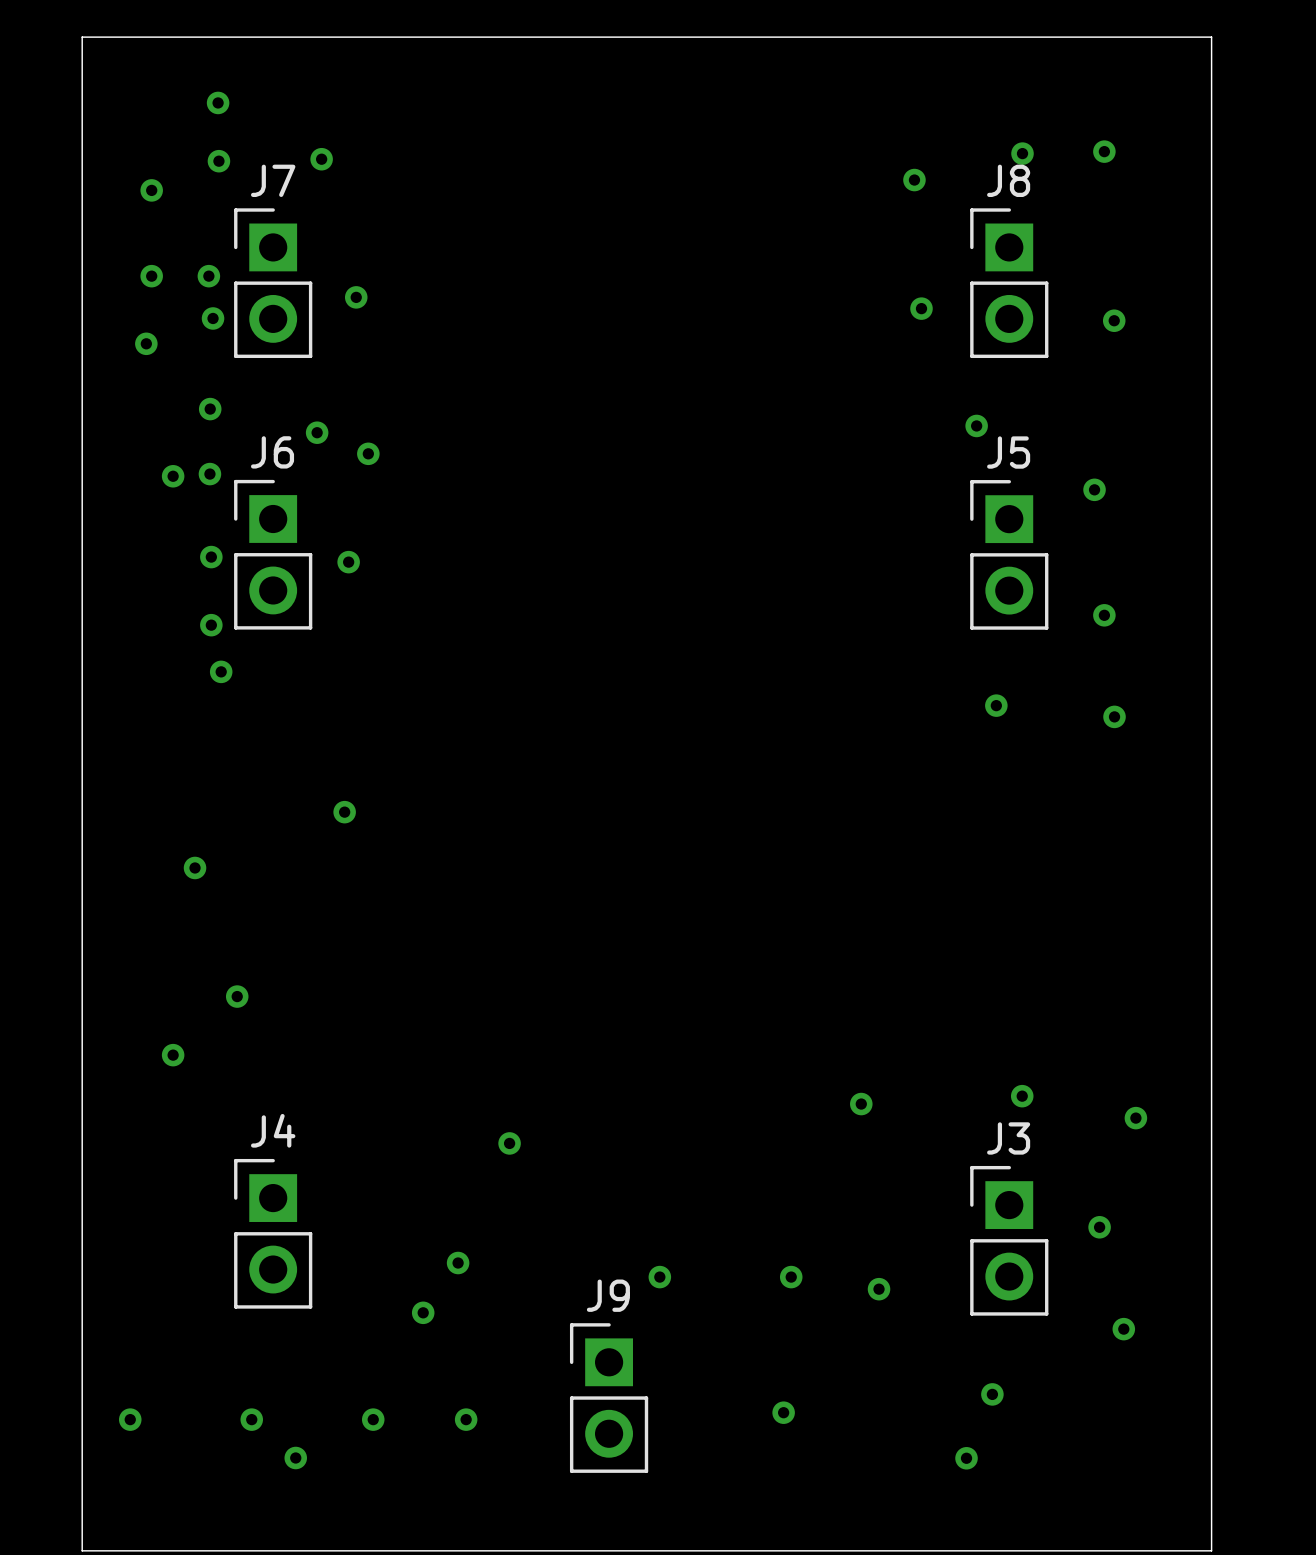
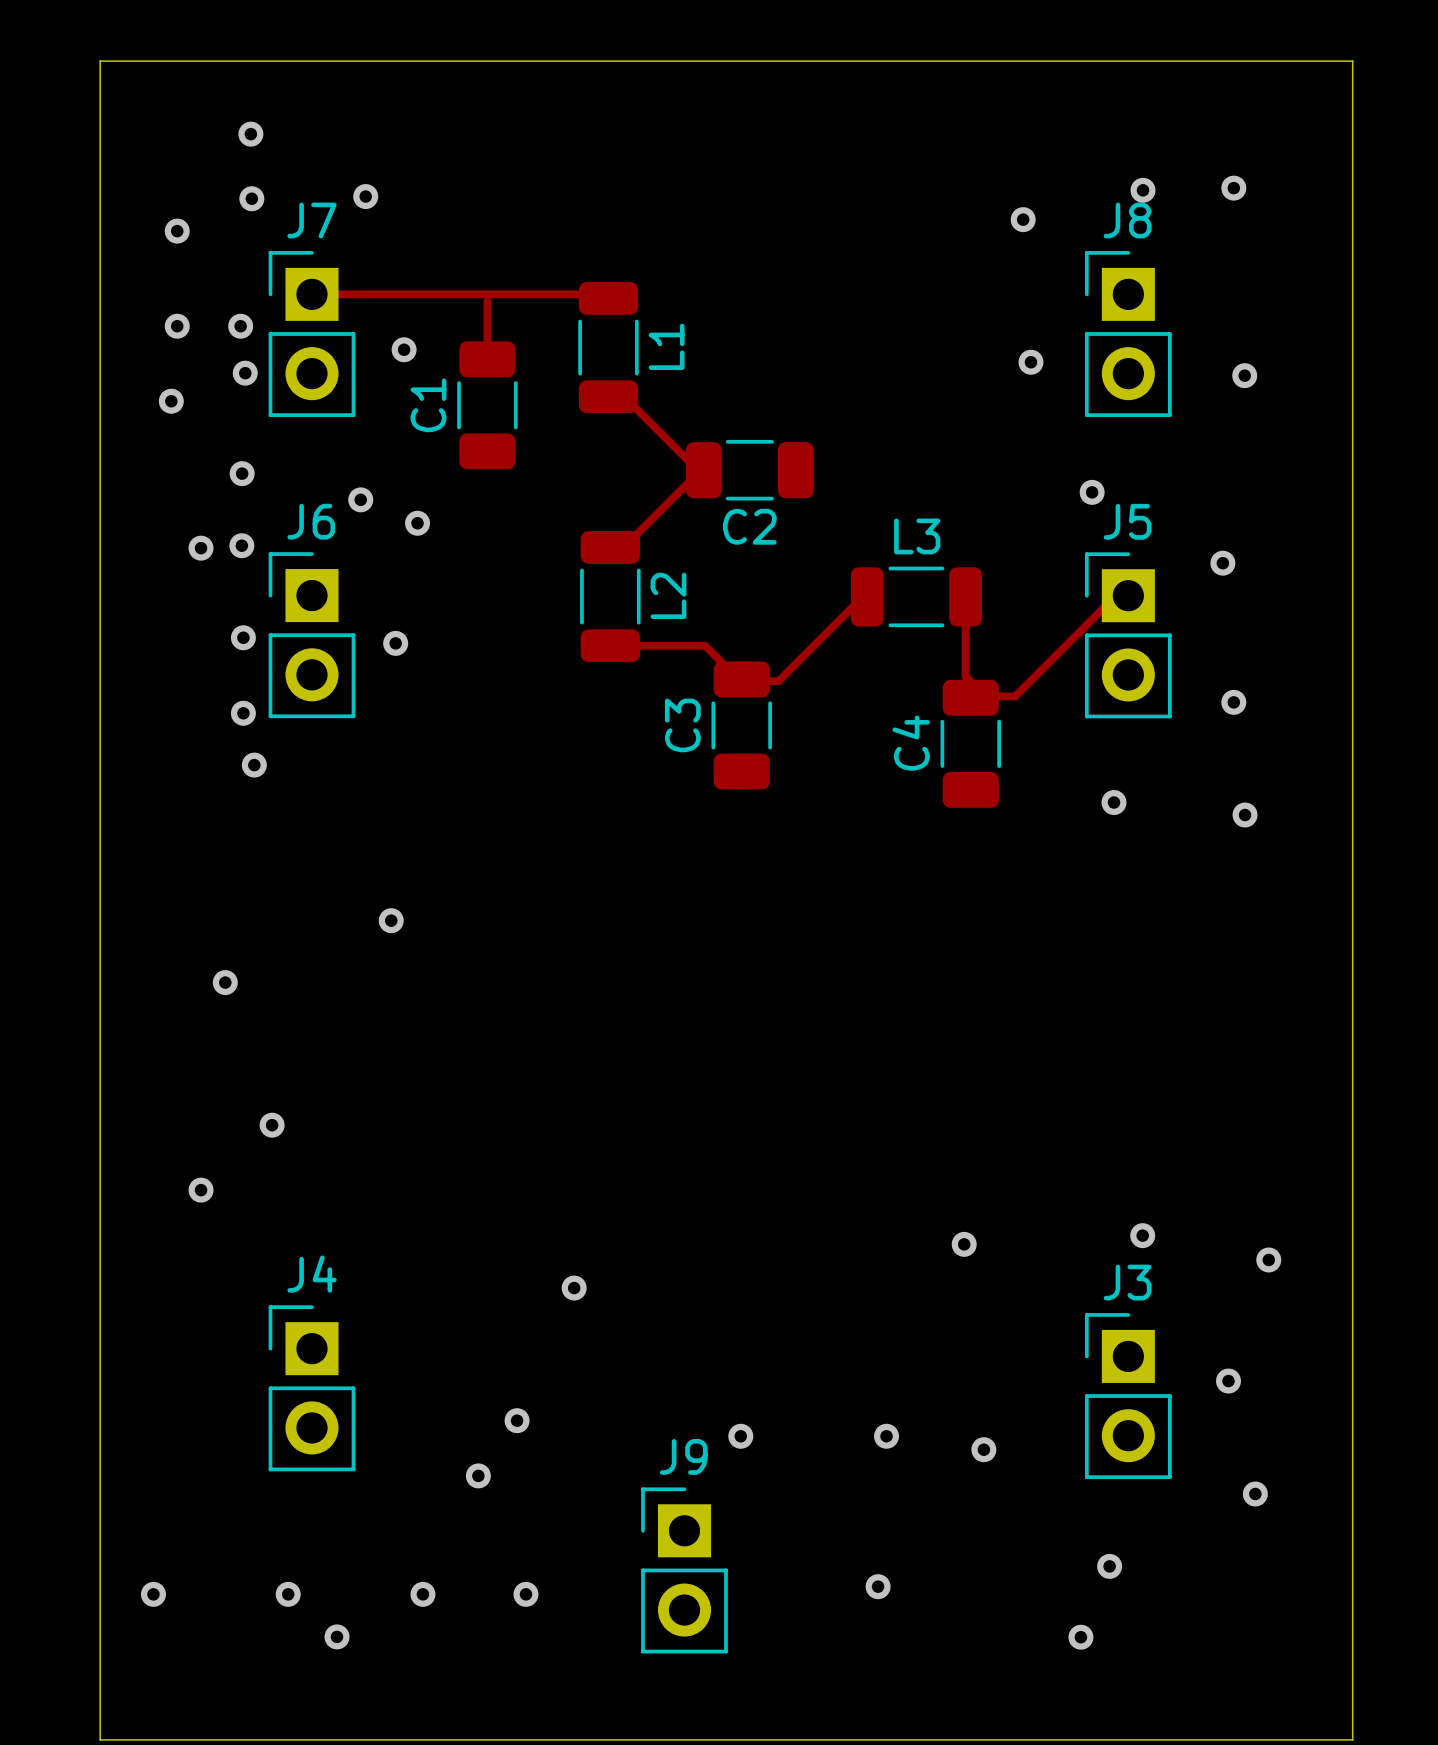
top track: none -> (311, 294) (618, 294)
top track: none -> (487, 301) (487, 359)
L1: none -> (608, 347)
top track: none -> (608, 396) (624, 396) (699, 471) (624, 546) (618, 546)
C1: none -> (487, 405)
C2: none -> (749, 470)
L2: none -> (610, 596)
L3: none -> (916, 596)
top track: none -> (965, 596) (965, 676) (985, 696) (1015, 696) (1113, 597)
top track: none -> (861, 597) (778, 681) (740, 681) (705, 645) (610, 645)
C3: none -> (741, 725)
C4: none -> (970, 743)

